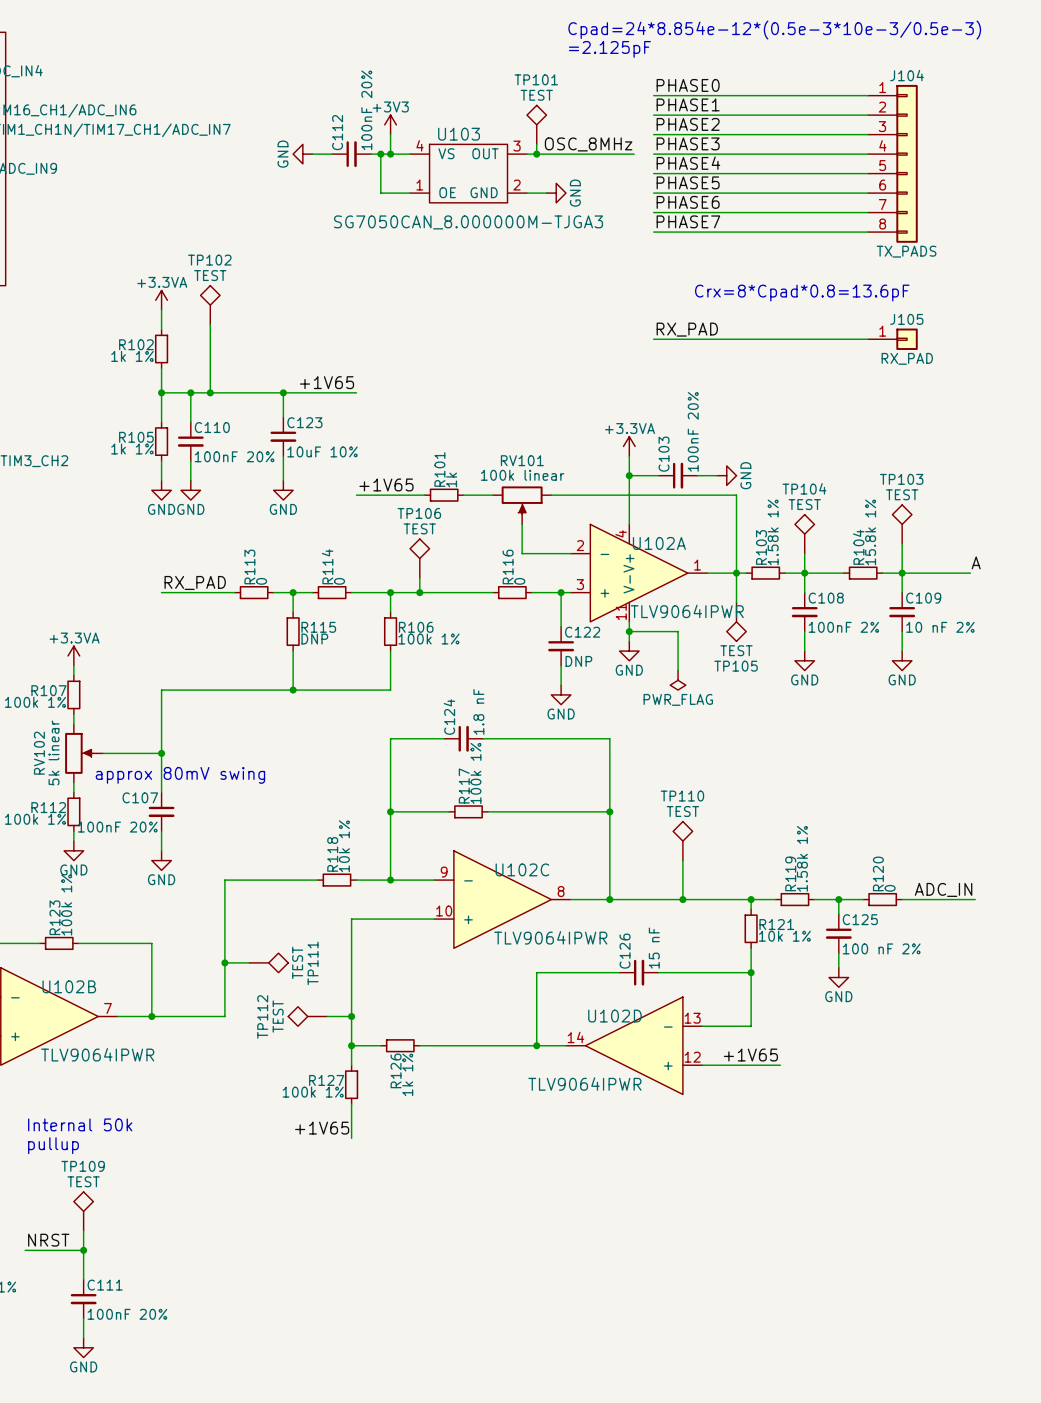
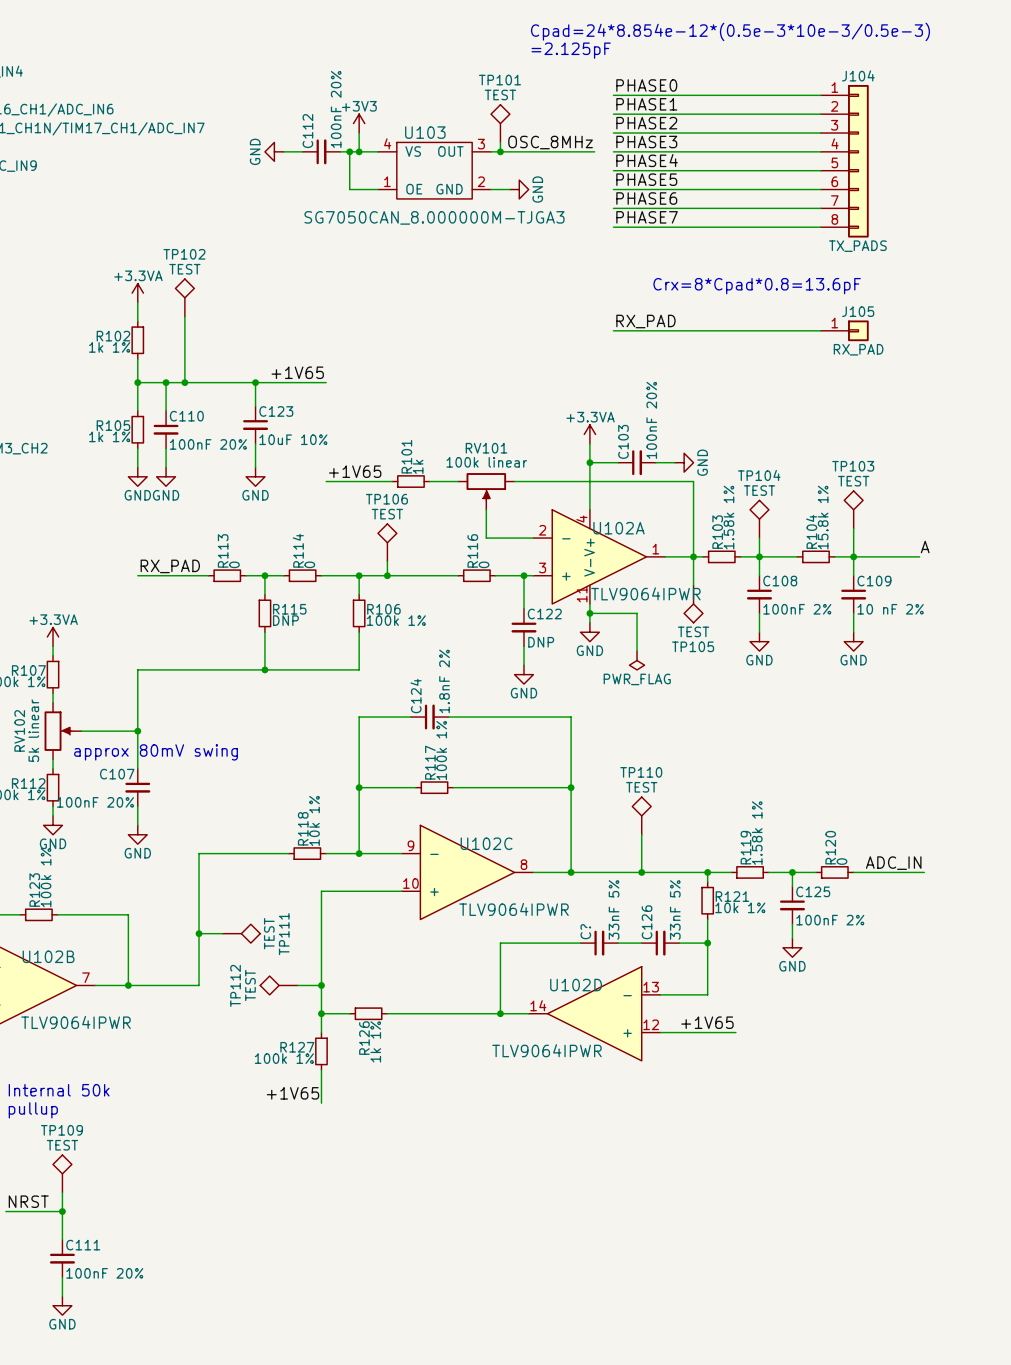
C124 value: 1.8 nF (478, 711) -> 1.8nF 2% (444, 681)
C126 value: 15 nF (654, 948) -> 33nF 5% (614, 909)
C125 value: 100 nF 2% (881, 948) -> 100nF 2% (830, 920)
C126 name: C126 (625, 951) -> C? (585, 931)
C126: none -> 33nF 5% (660, 943)

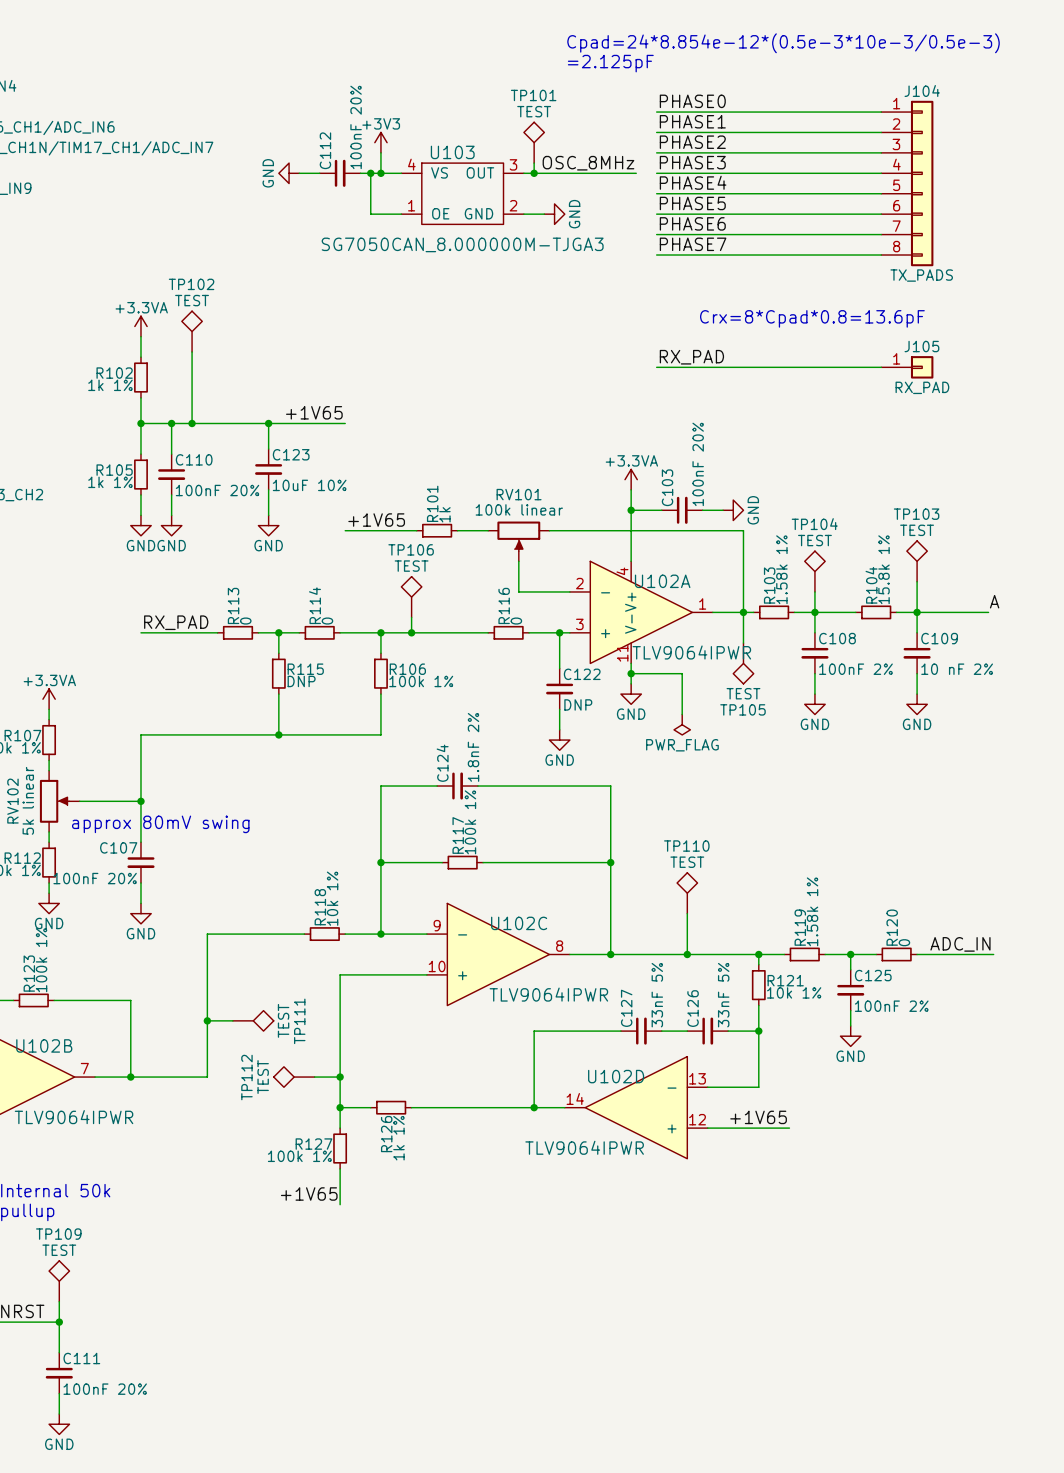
C? name: C? (585, 931) -> C127 (626, 1008)

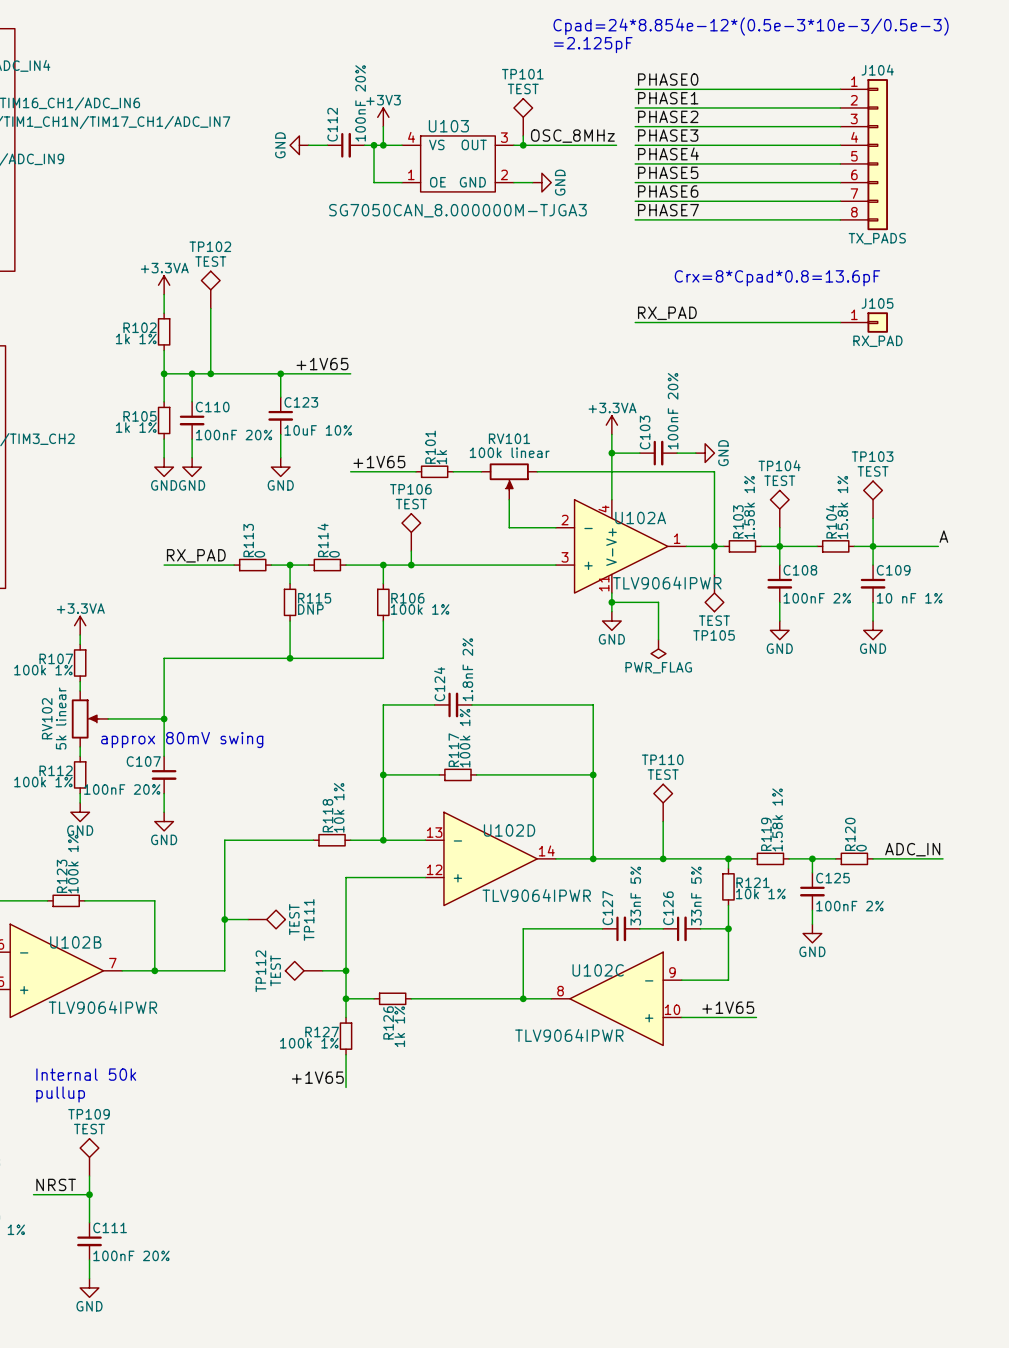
wire: none -> (481, 565) (518, 565)
R116: 0 (508, 632) -> none
wire: (559, 632) (559, 668) -> none
junction: (559, 632) -> none
C109 value: 10 nF 2% (957, 669) -> 10 nF 1% (909, 598)
C122: DNP (559, 688) -> none
wire: (559, 709) (559, 729) -> none
power symbol: GND (559, 740) -> none
U102C flip: as is (498, 954) -> left-right (616, 998)
U102C position: (498, 954) -> (616, 998)
U102D flip: as is (636, 1107) -> left-right (490, 858)
U102D position: (636, 1107) -> (490, 858)

